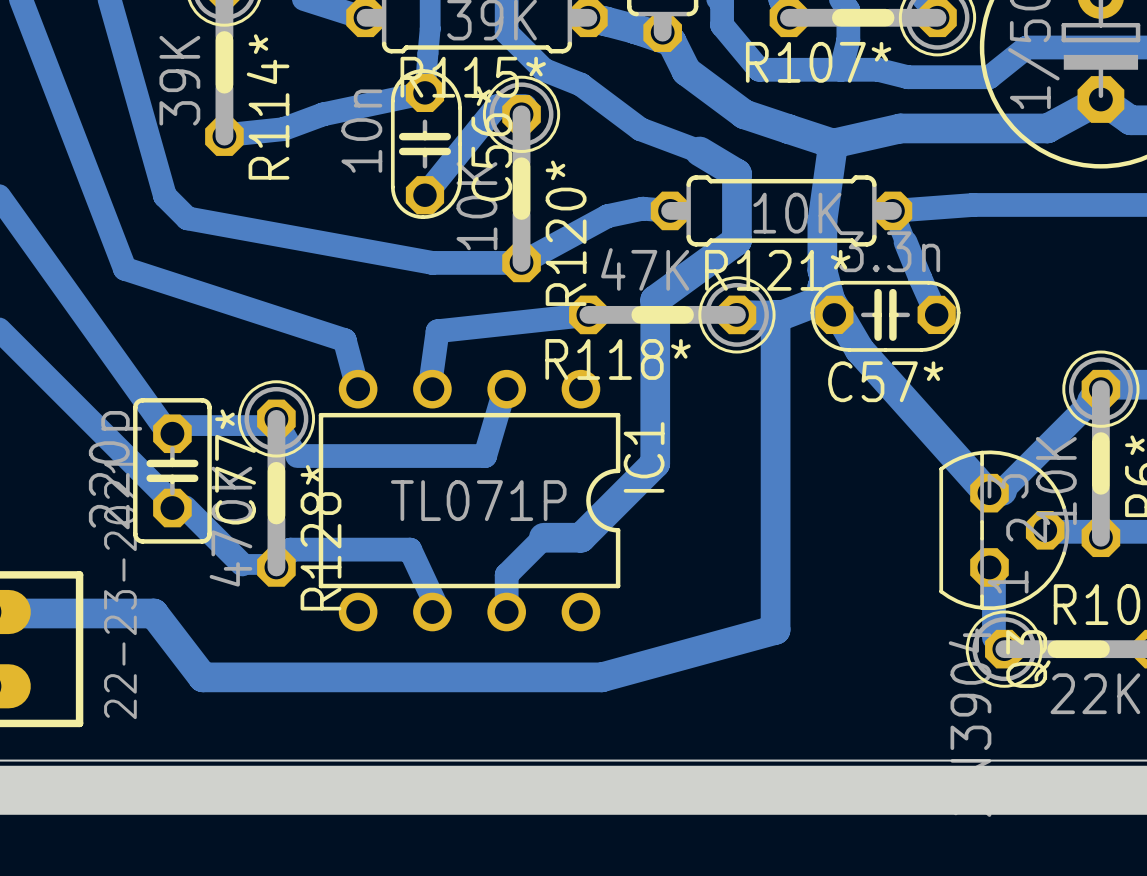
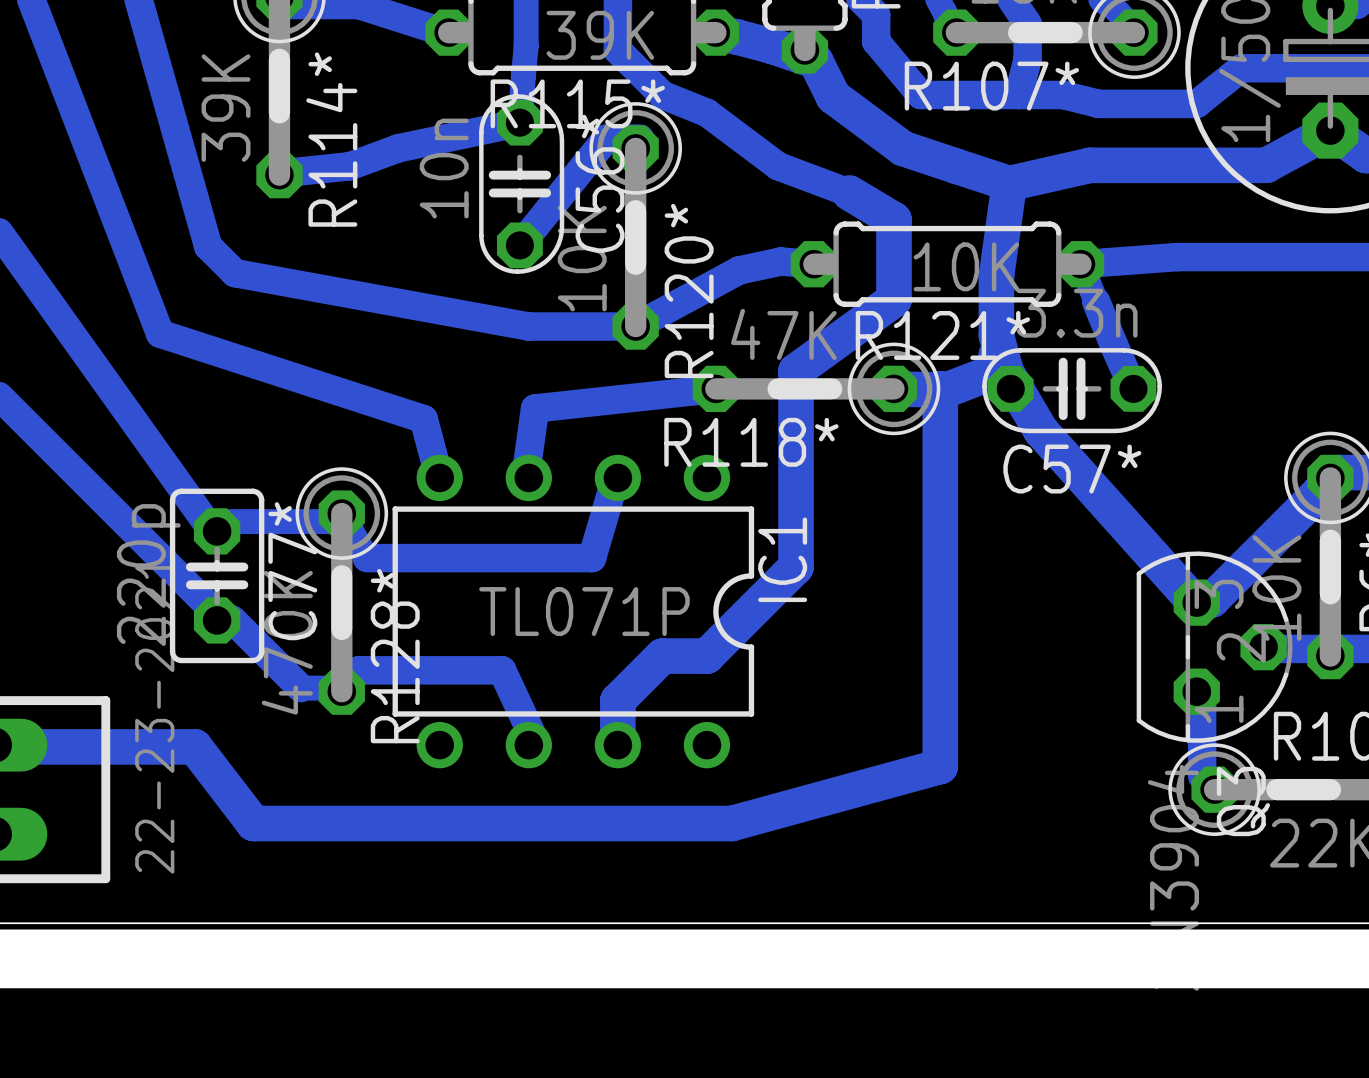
bottom track width: thin (1092, 401) (1002, 490) -> thick (1319, 492) (1211, 599)
bottom track width: thin (543, 537) (506, 574) (506, 612) -> thick (662, 656) (617, 700) (617, 745)

